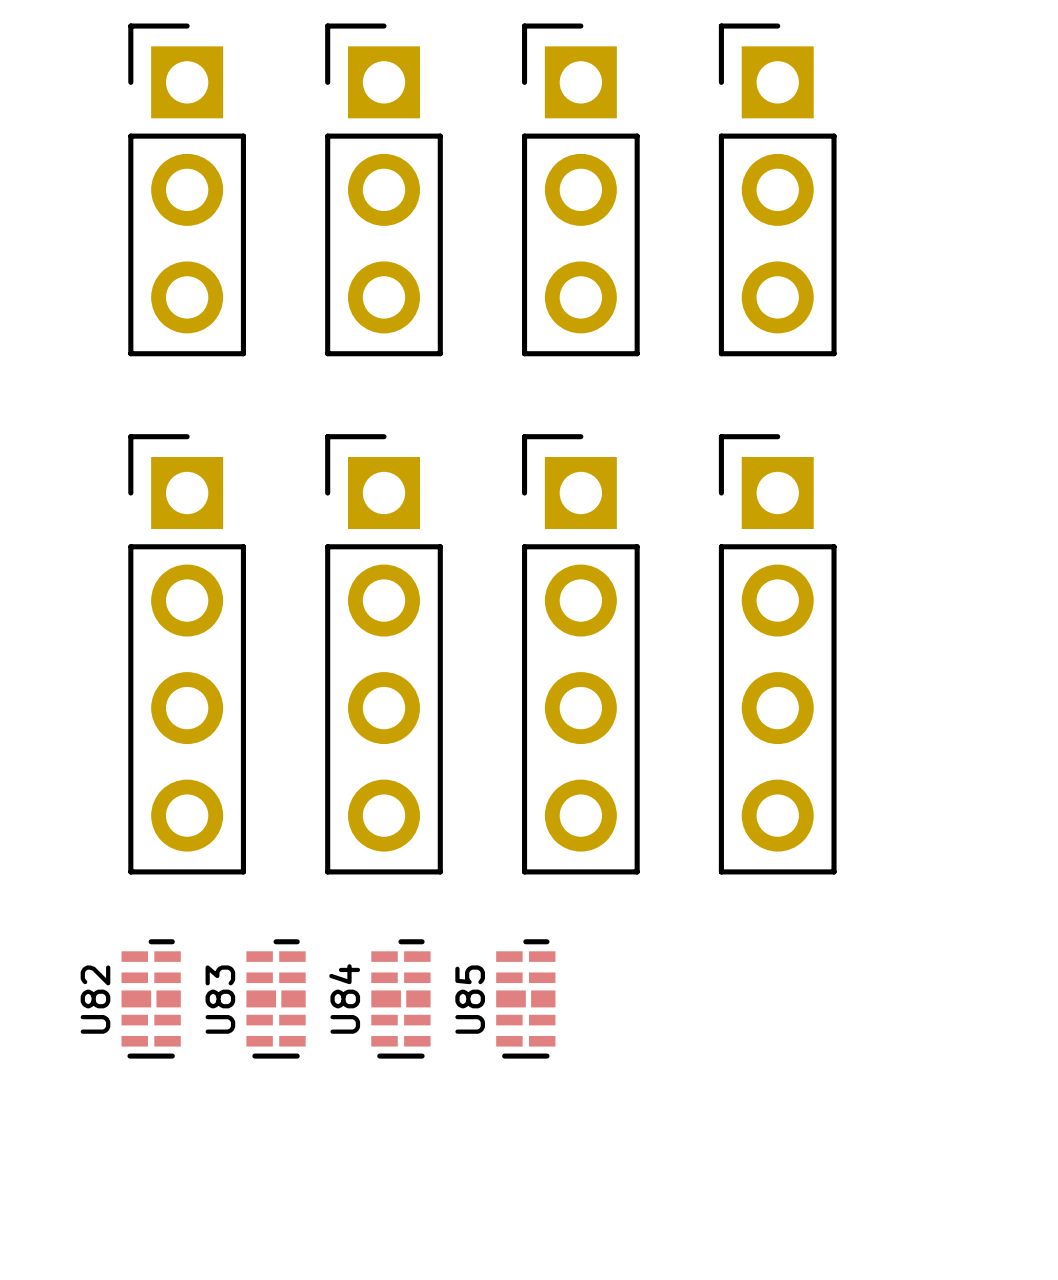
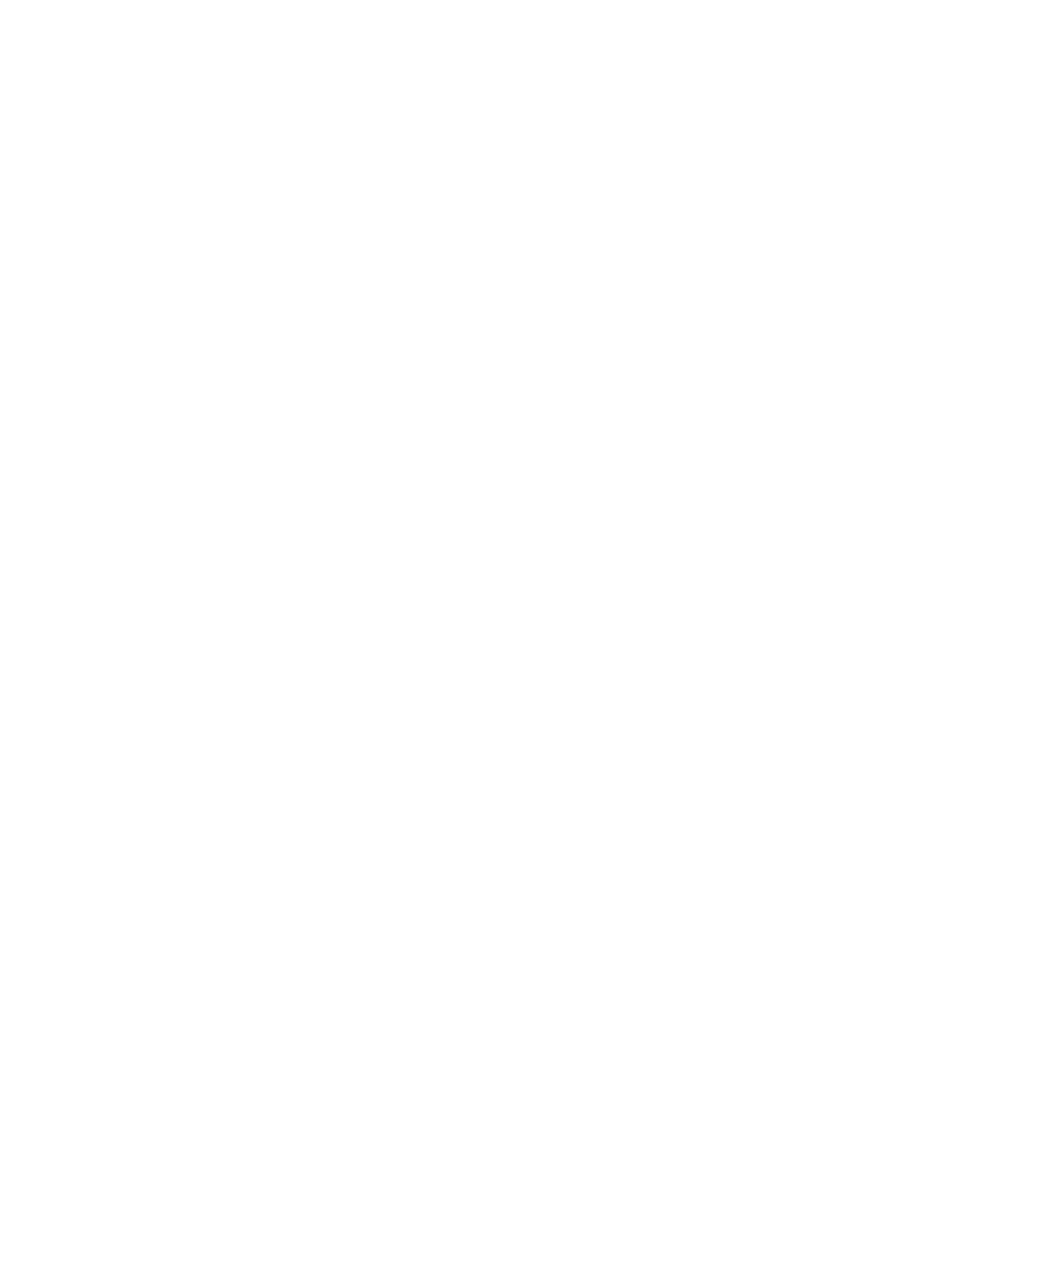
part: (187, 189) -> none
part: (383, 189) -> none
part: (580, 189) -> none
part: (777, 189) -> none
part: (187, 654) -> none
part: (383, 654) -> none
part: (580, 654) -> none
part: (777, 654) -> none
U82: (151, 998) -> none
U83: (276, 998) -> none
U84: (400, 998) -> none
U85: (525, 998) -> none

